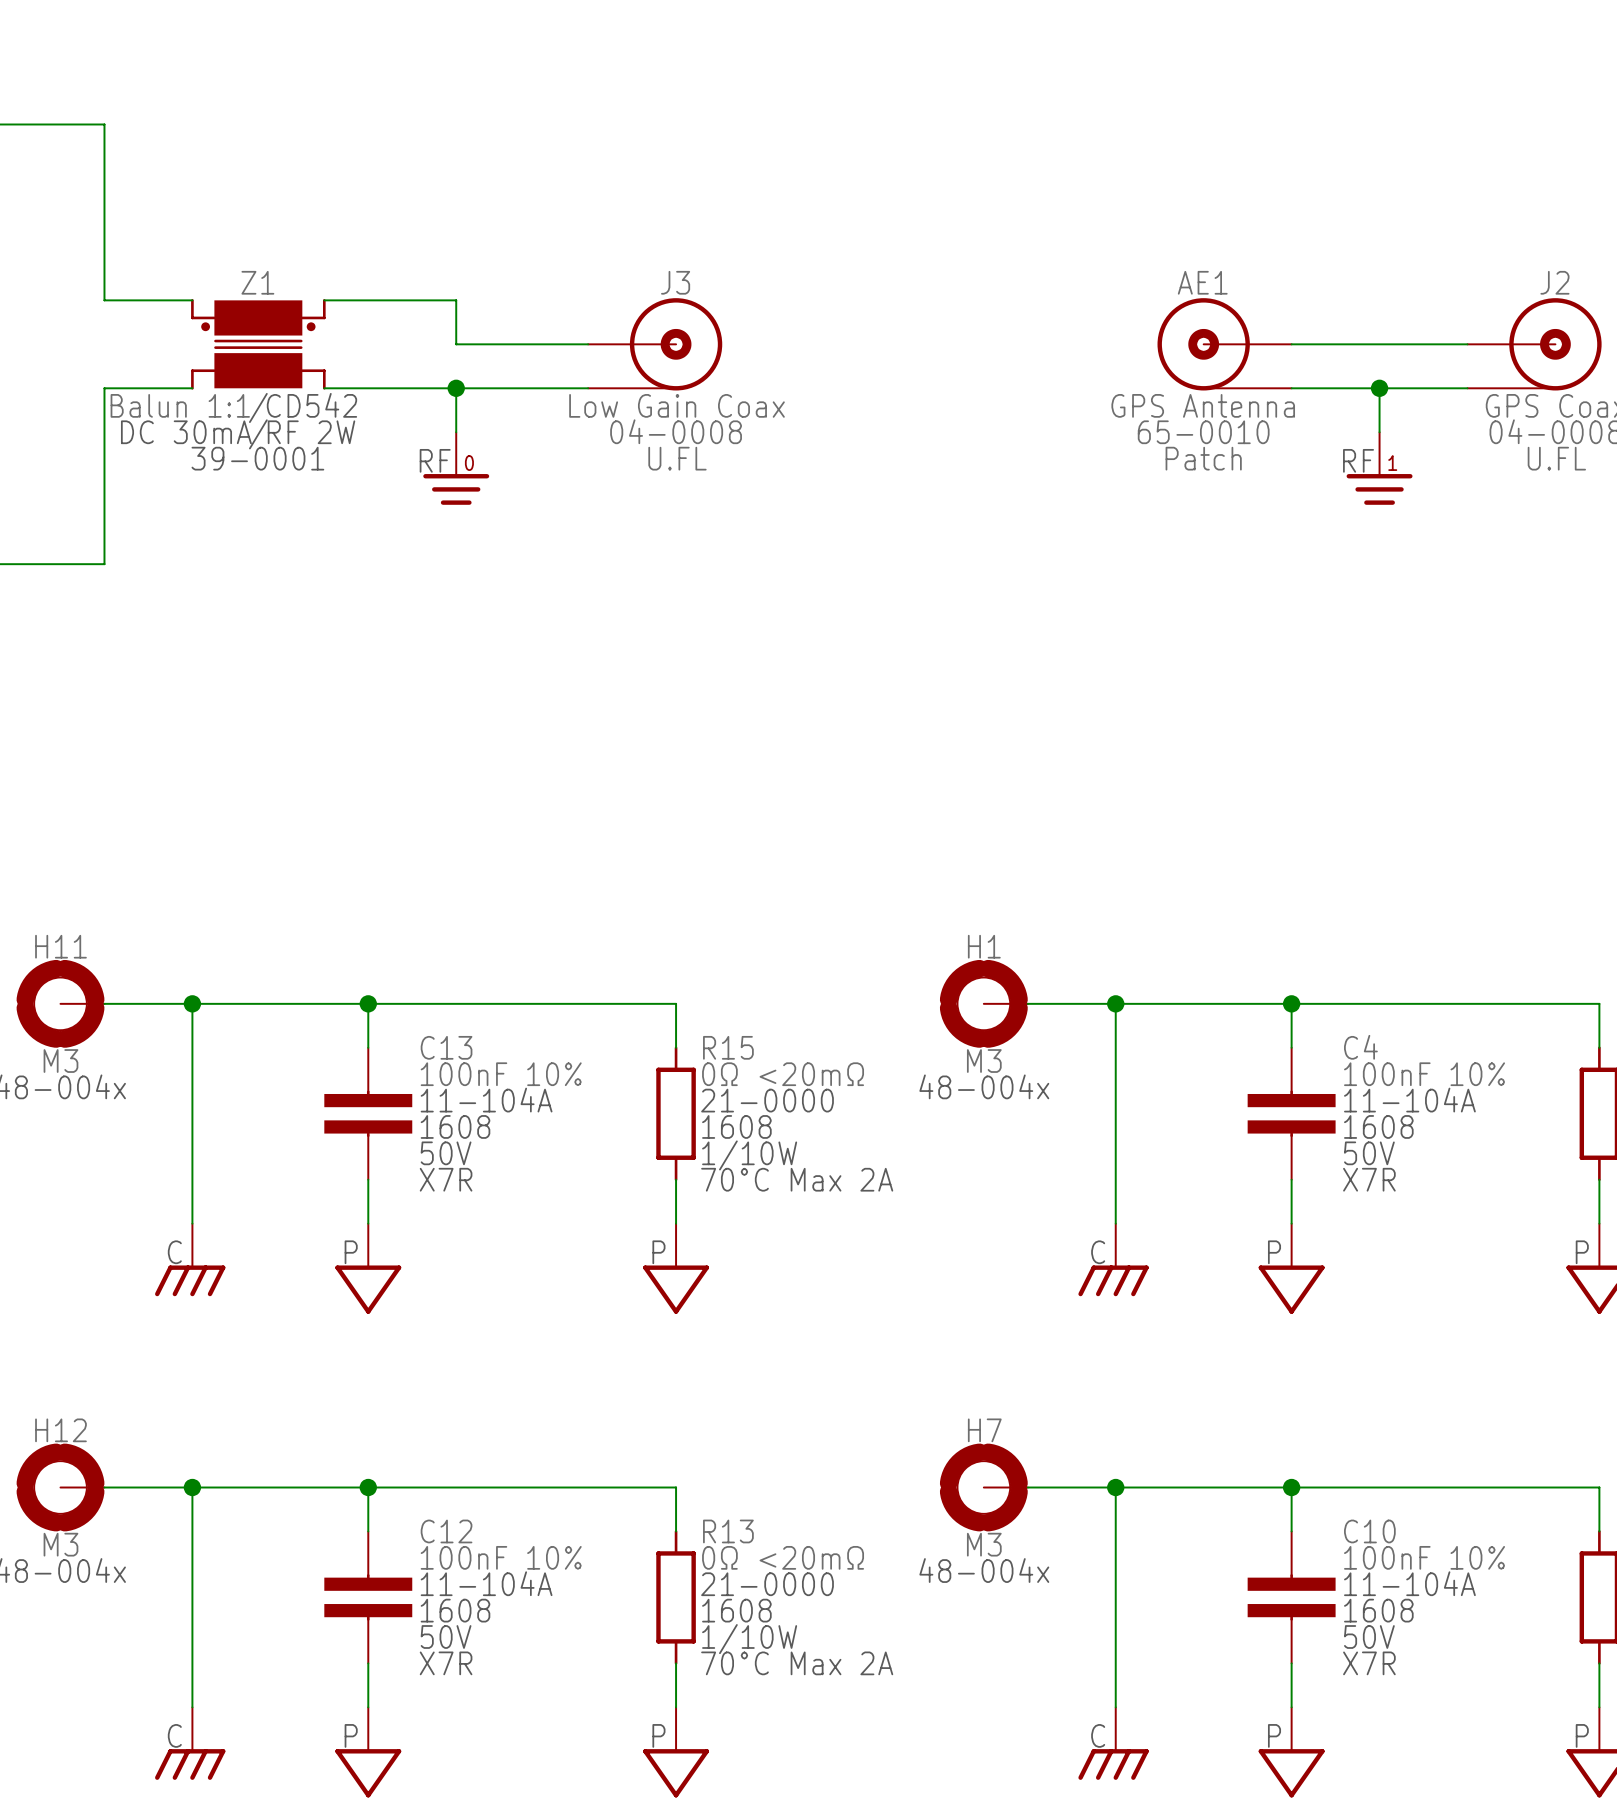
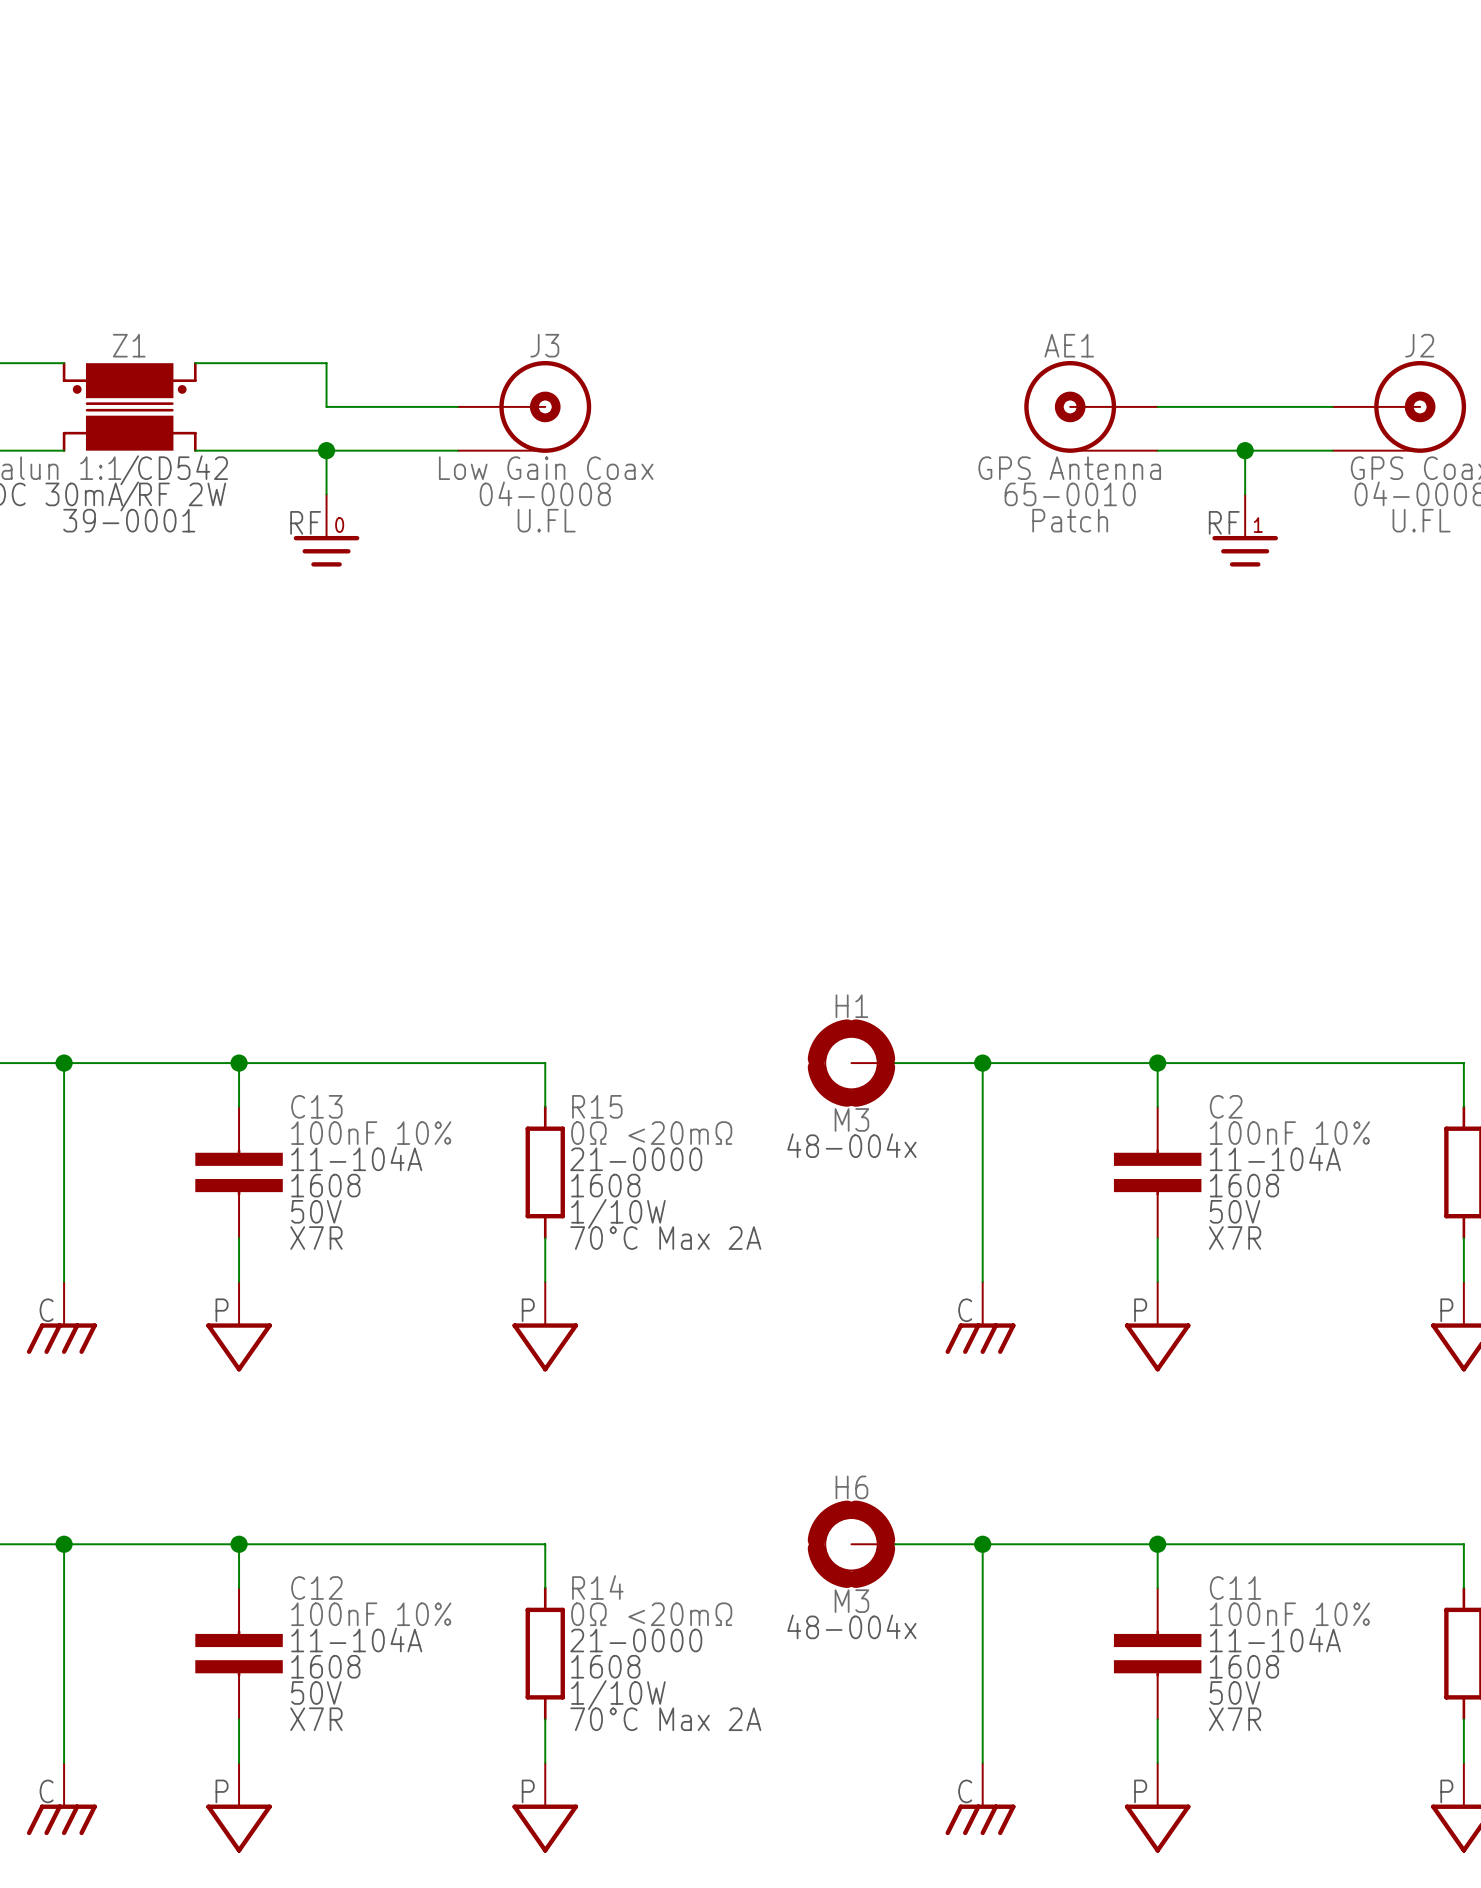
C4 name: C4 (1360, 1047) -> C2 (1226, 1106)
H7 name: H7 (984, 1430) -> H6 (851, 1487)
R13 name: R13 (728, 1531) -> R14 (597, 1587)
C10 name: C10 (1369, 1531) -> C11 (1235, 1588)

